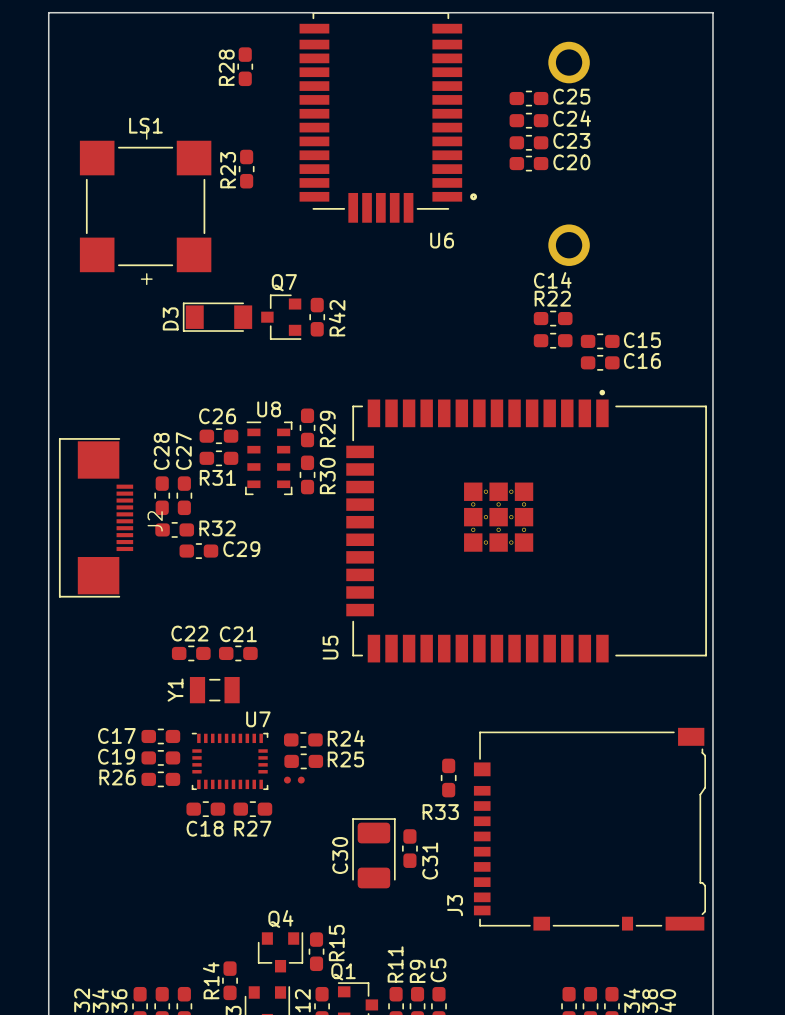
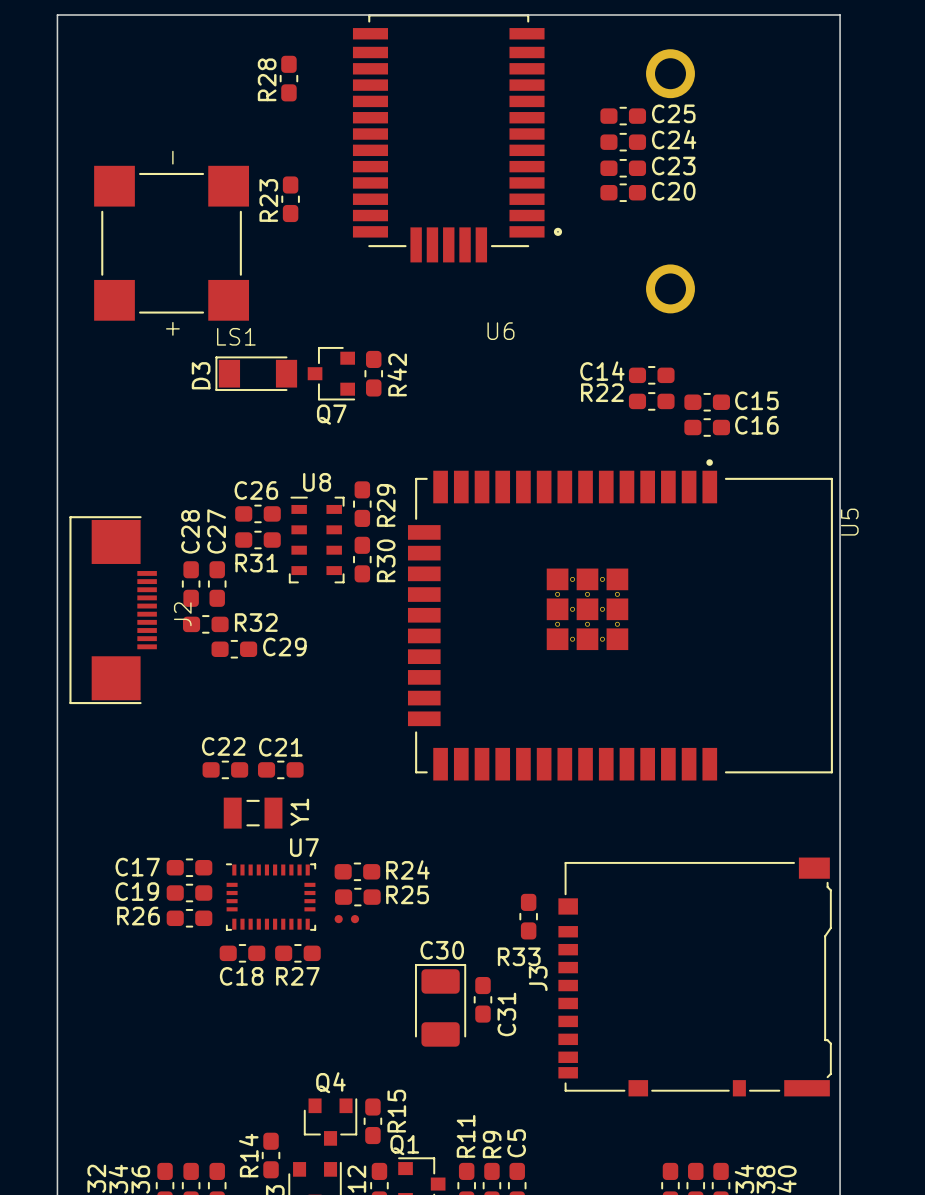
LS1 name position: LS1 (145, 125) -> LS1 (236, 336)
U6 name position: U6 (442, 240) -> U6 (500, 331)
C14 name position: C14 (552, 280) -> C14 (602, 371)
Q7 name position: Q7 (284, 282) -> Q7 (331, 414)
R22 name position: R22 (552, 298) -> R22 (602, 392)
U5 name position: U5 (330, 647) -> U5 (849, 522)
Y1 name position: Y1 (175, 690) -> Y1 (299, 812)
C30 name rotation: 0° (340, 855) -> 90° clockwise (442, 950)
C30 name position: C30 (340, 855) -> C30 (442, 950)
J3 name position: J3 (455, 905) -> J3 (538, 978)

